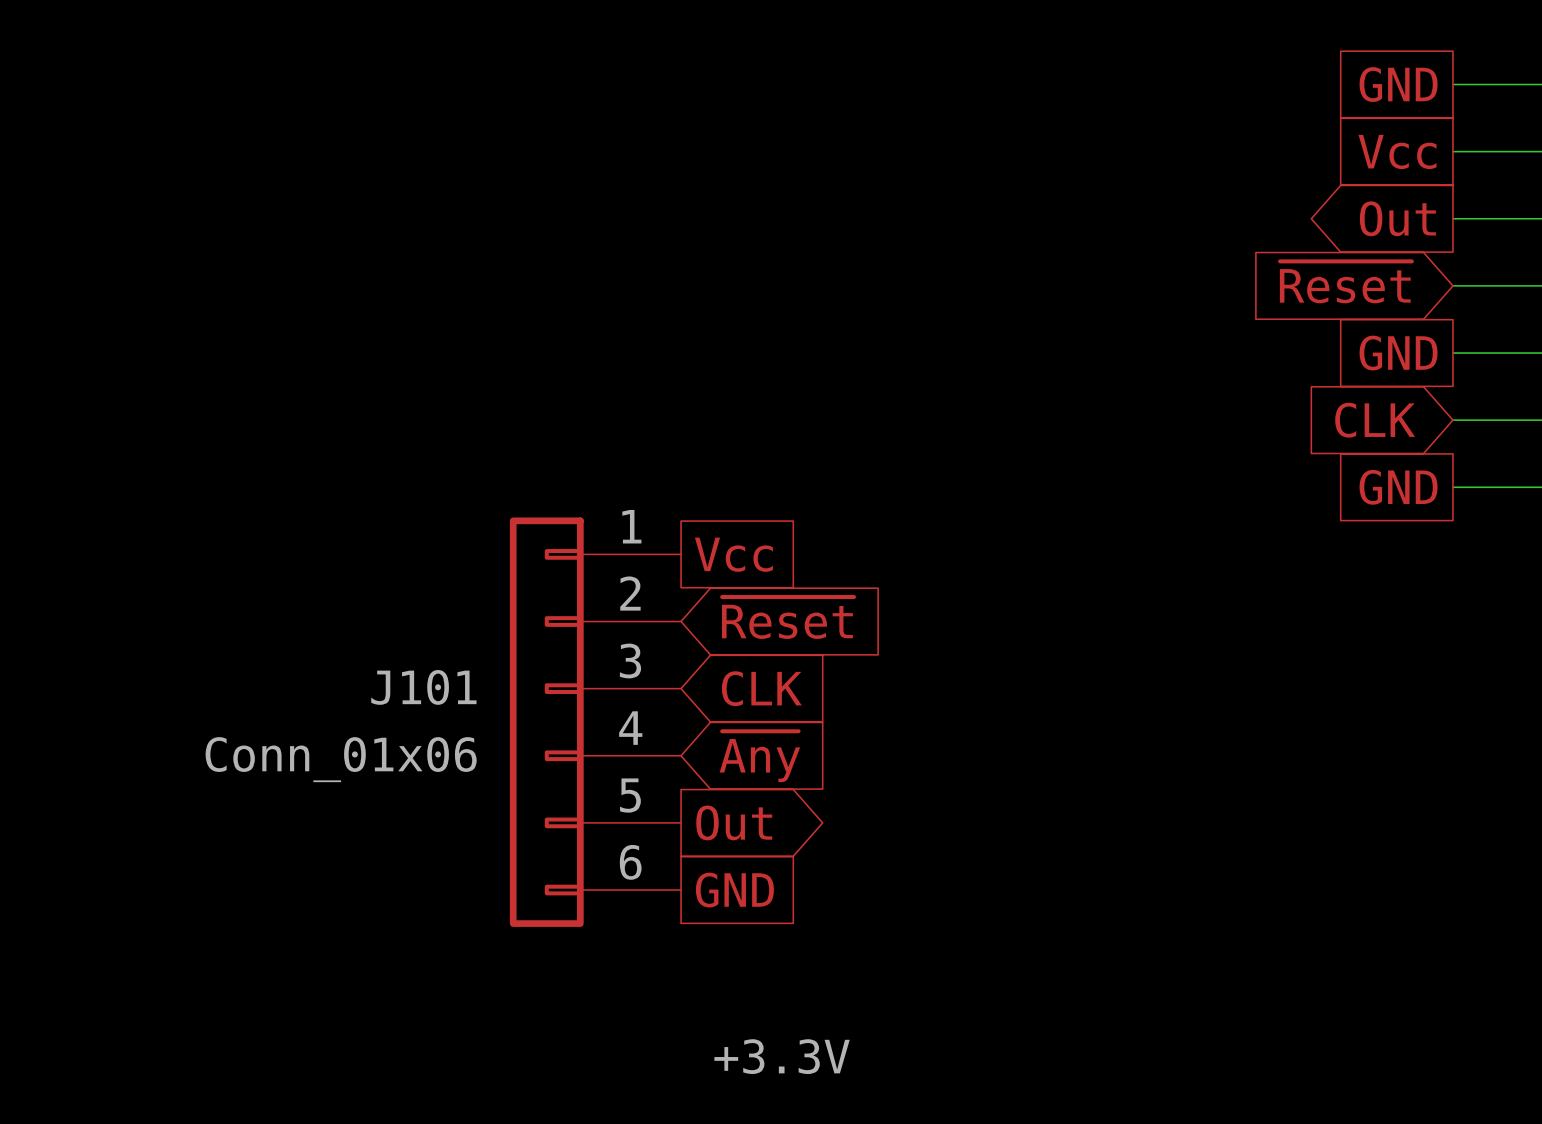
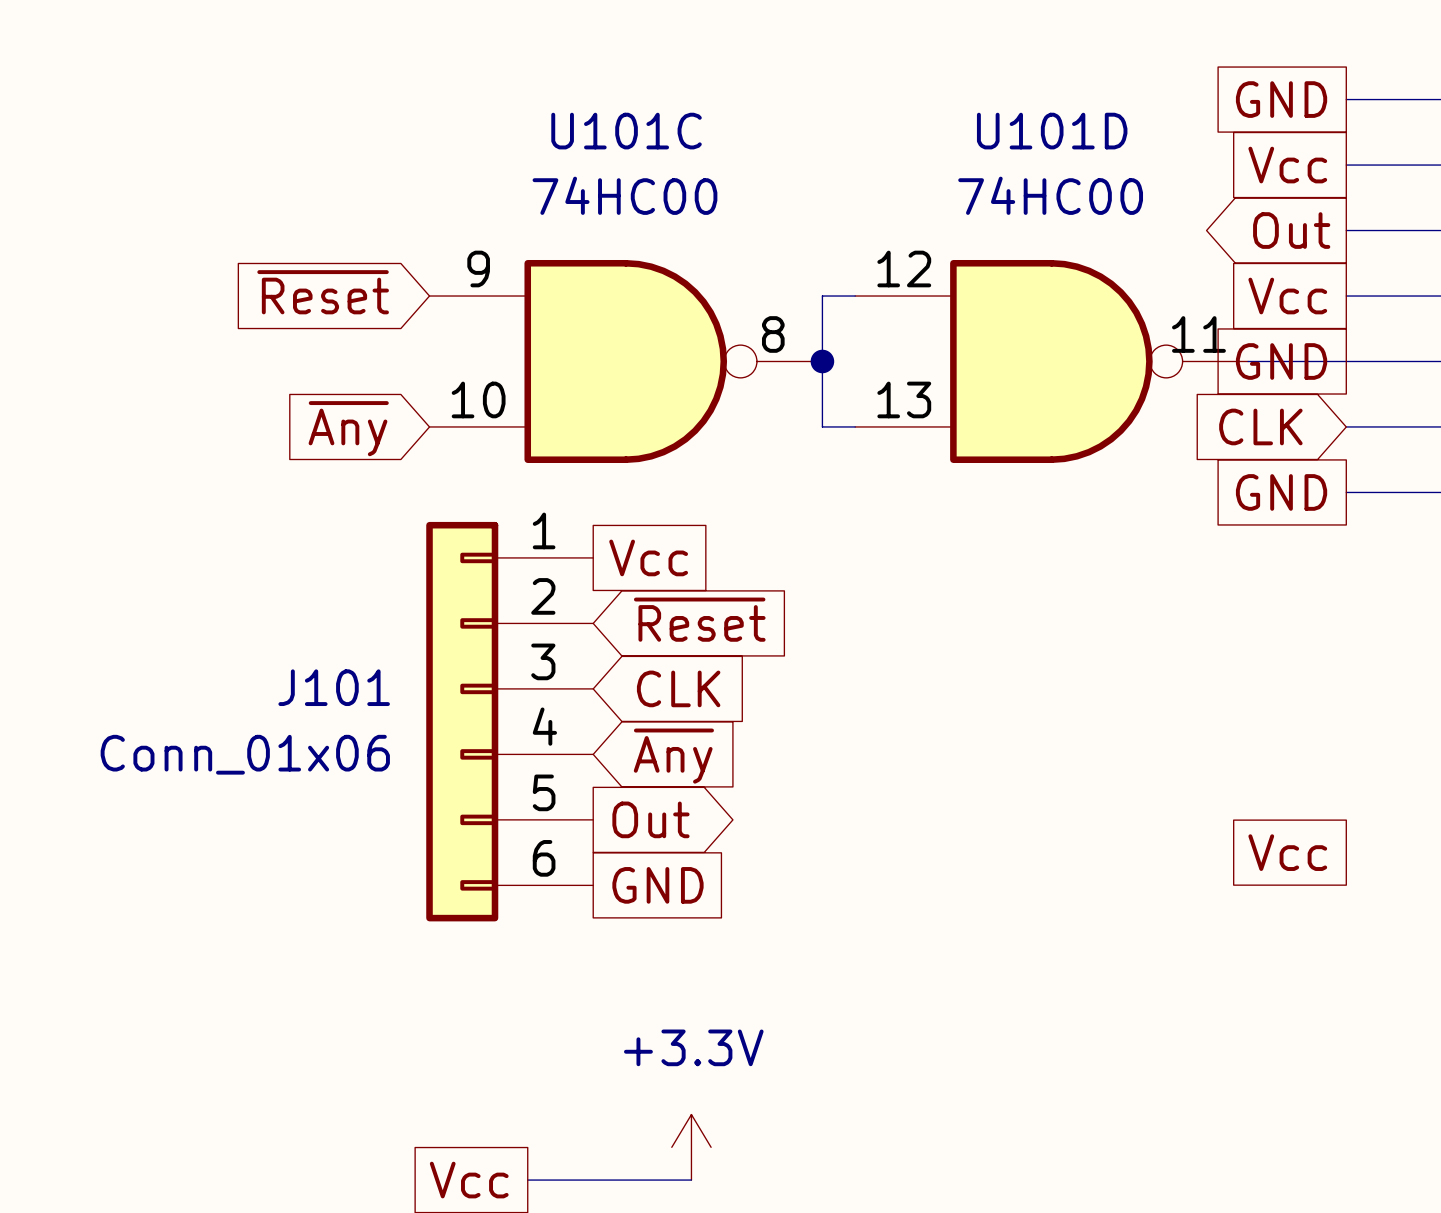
global label: none -> ~{Reset} (323, 292)
global label shape: input (1345, 282) -> passive (1287, 296)
global label: ~{Reset} (1345, 282) -> Vcc (1287, 296)
wire: none -> (855, 296) (822, 296) (822, 426) (855, 426)
U101C: none -> 74HC00 (625, 361)
junction: none -> (822, 361)
U101D: none -> 74HC00 (1051, 361)
wire: none -> (1248, 361) (1346, 361)
global label: none -> ~{Any} (348, 428)
global label: none -> Vcc (1287, 852)

